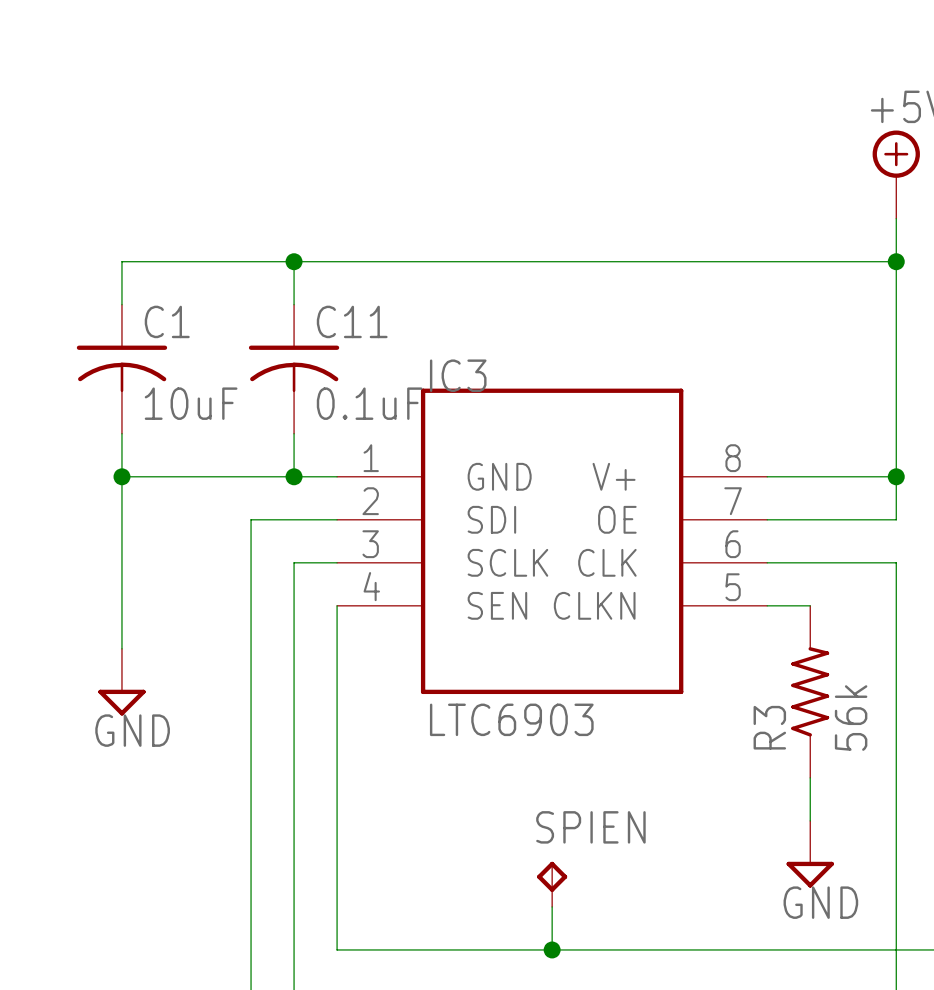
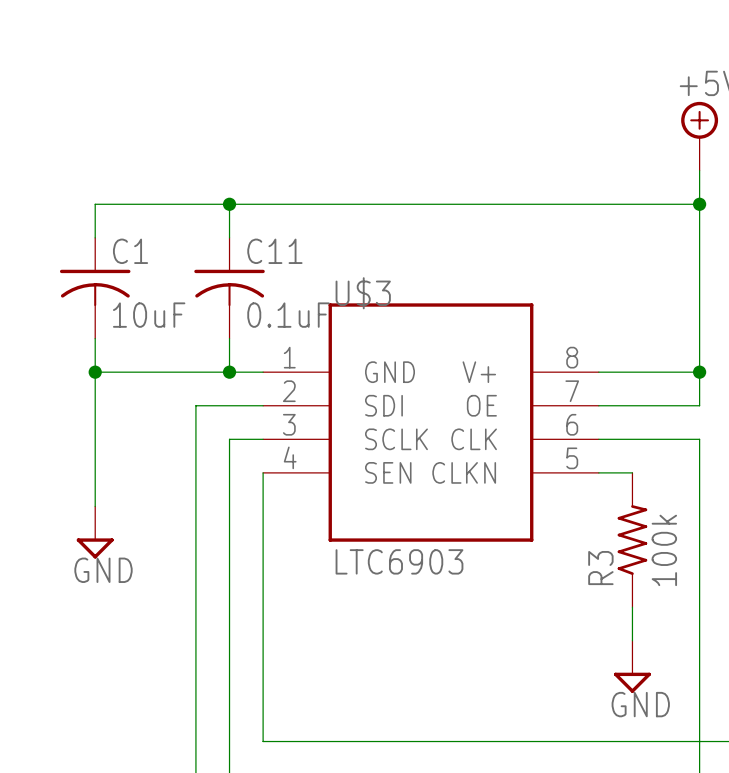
IC3 name: IC3 (458, 375) -> U$3 (363, 293)
R3 value: 56k (851, 718) -> 100k (664, 550)
SPIEN: (552, 884) -> none
wire: (552, 906) (552, 949) -> none
junction: (552, 949) -> none

